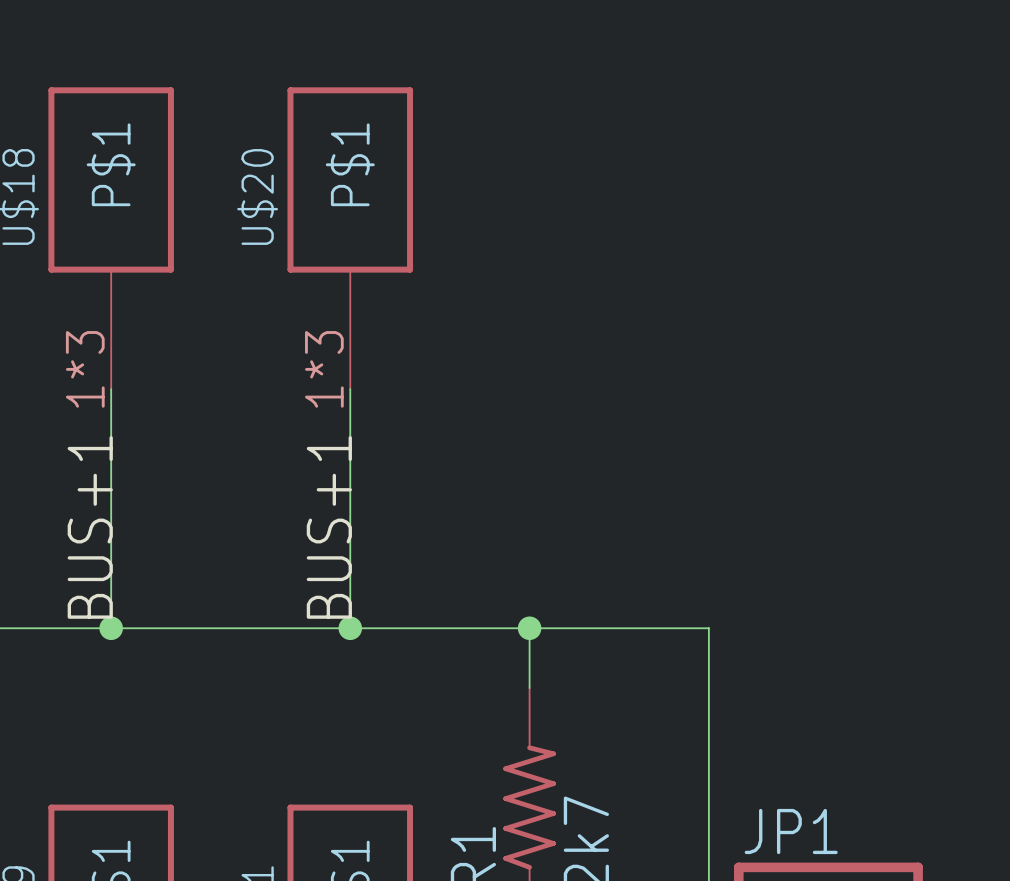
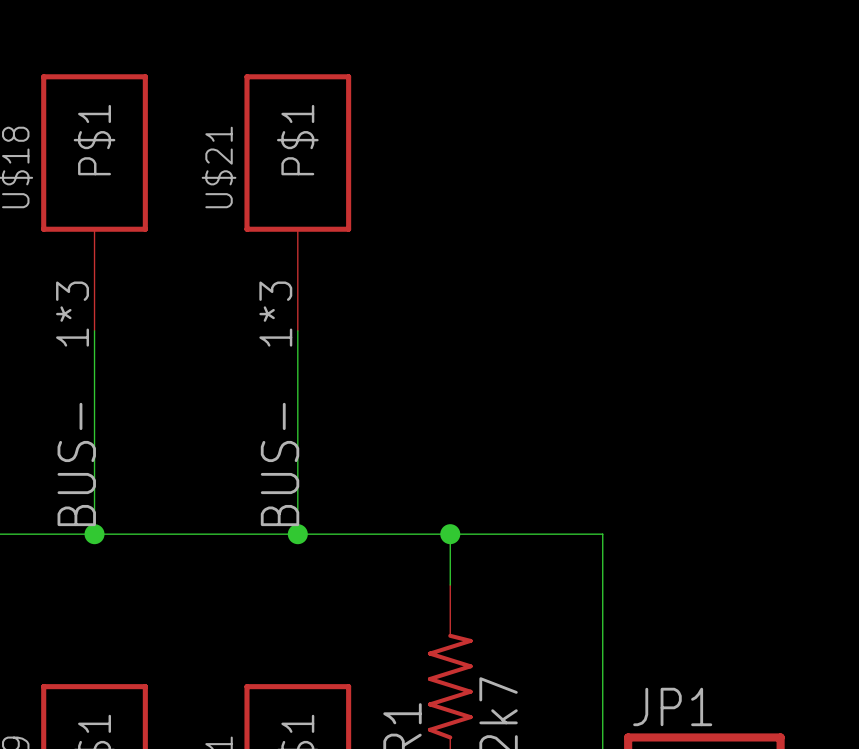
U$20 name: U$20 (257, 196) -> U$21 (219, 167)
label: BUS+1 (90, 527) -> BUS- (76, 464)
label: BUS+1 (329, 527) -> BUS- (280, 464)

